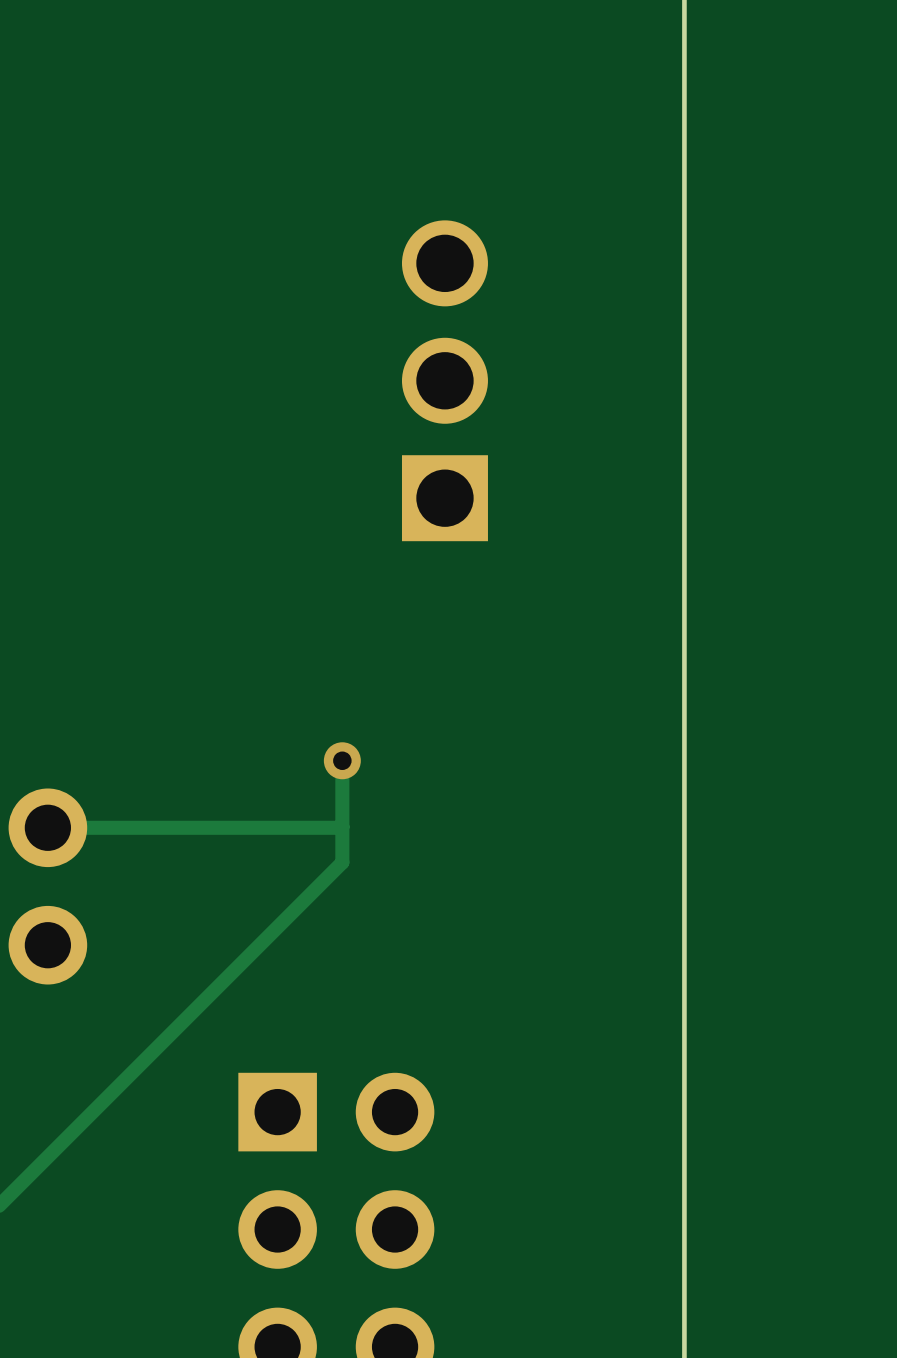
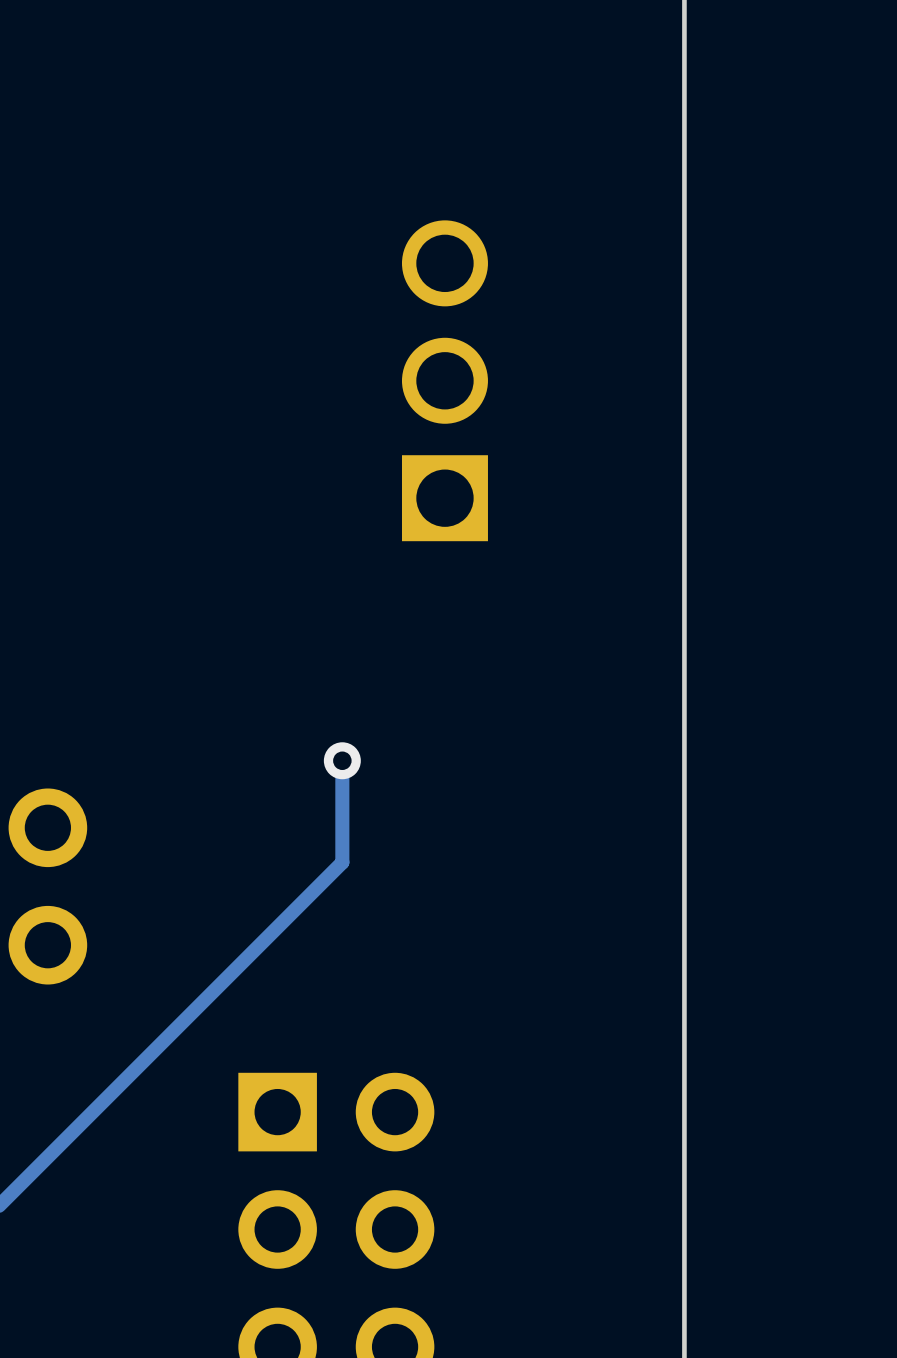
track: (342, 826) (47, 827) -> none

